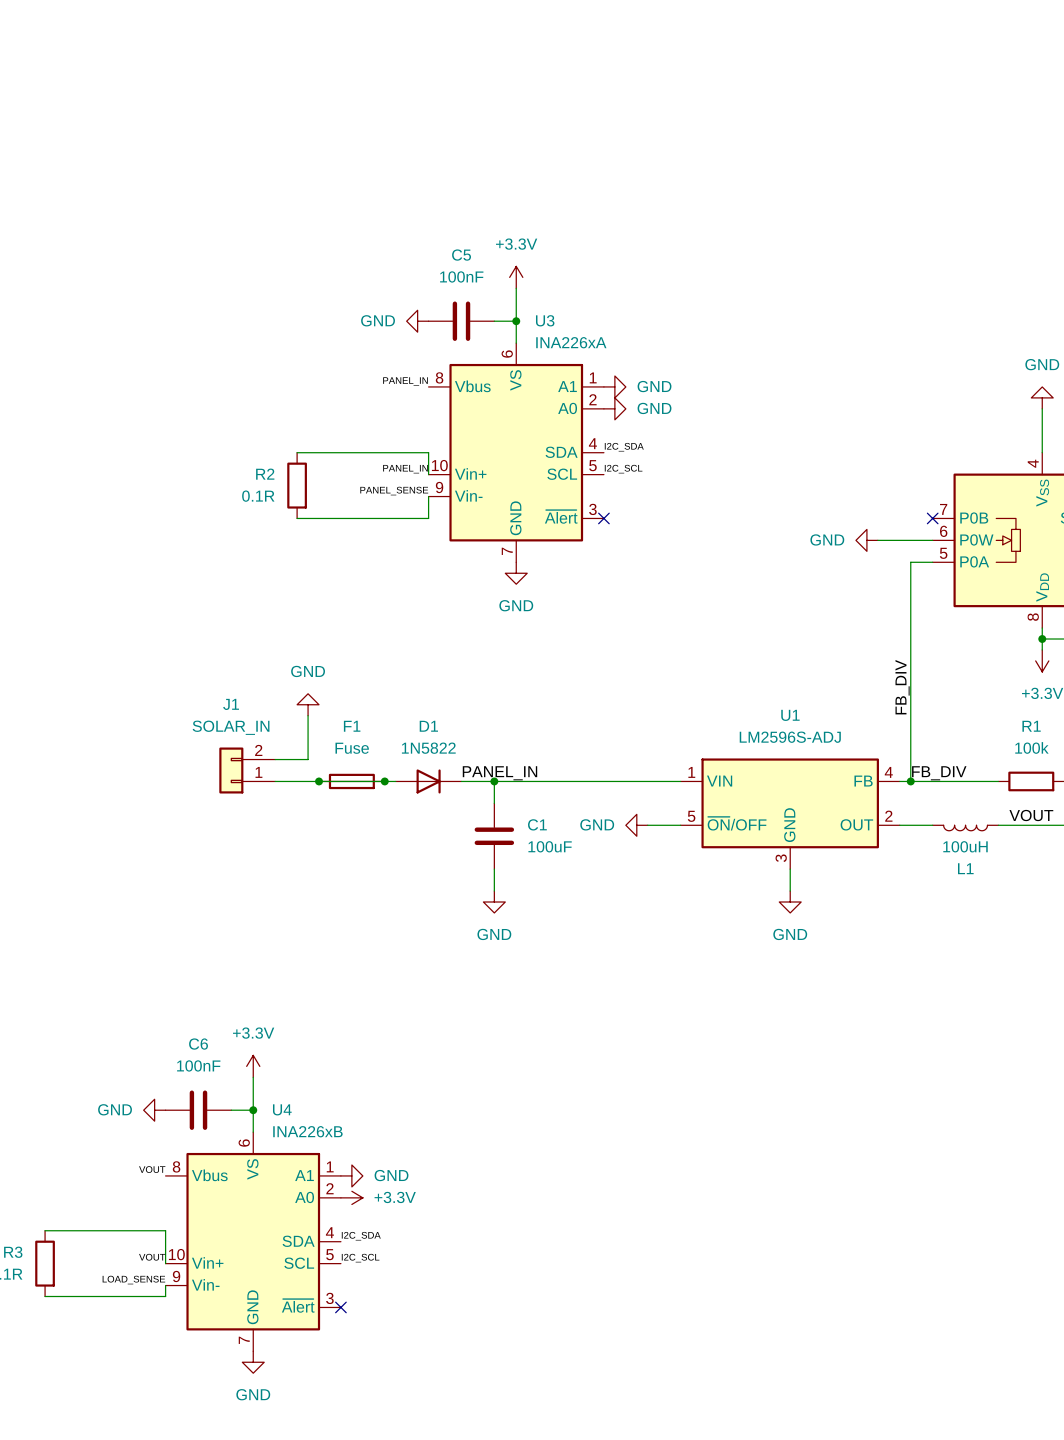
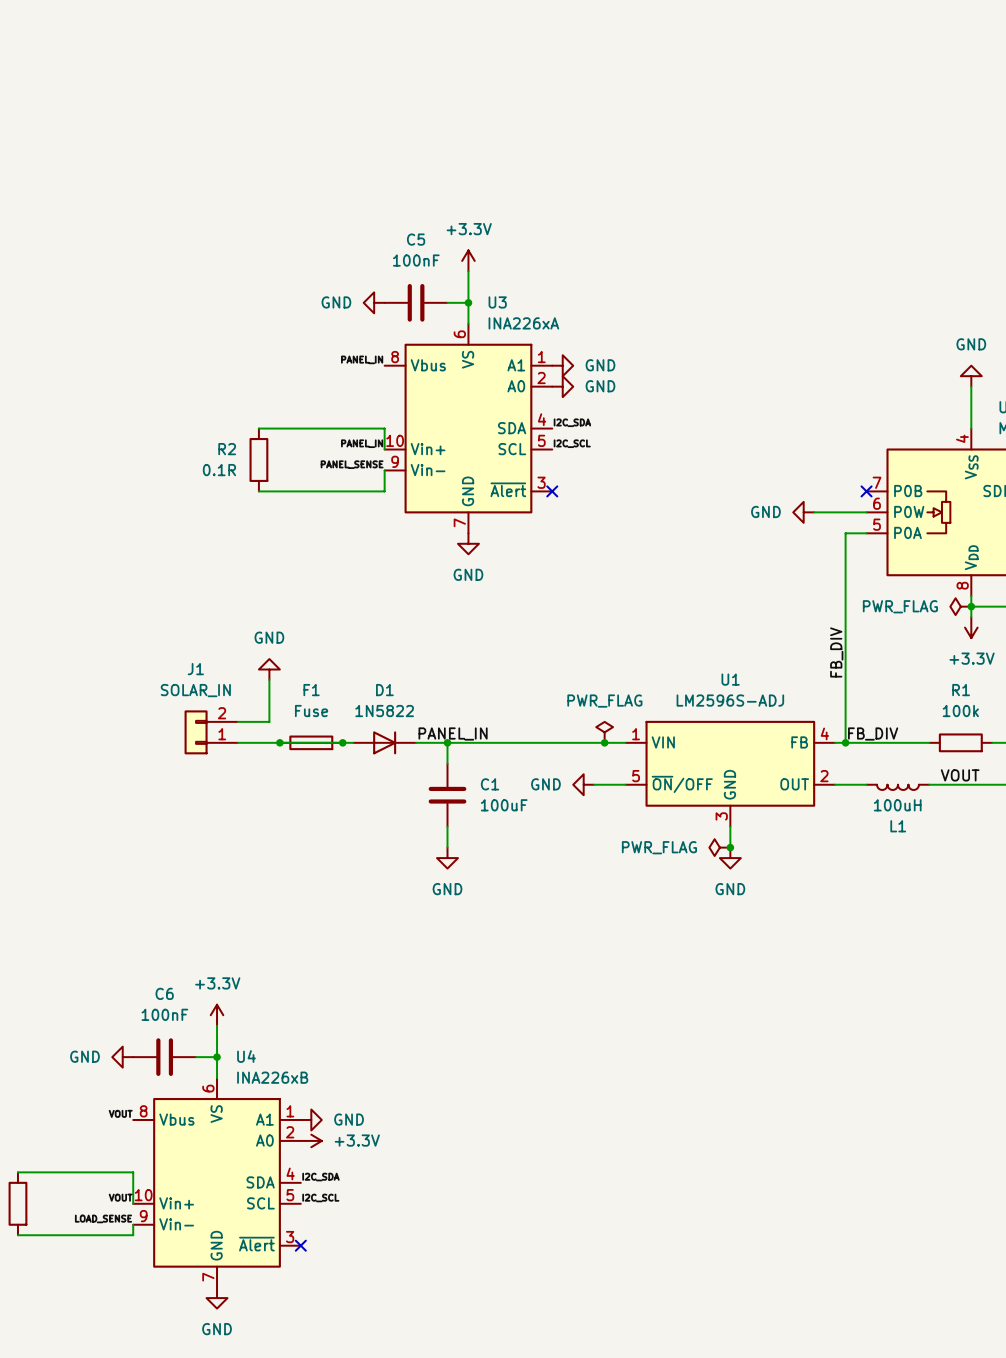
power symbol: none -> PWR_FLAG (960, 606)
power symbol: none -> PWR_FLAG (604, 732)
junction: none -> (604, 742)
power symbol: none -> PWR_FLAG (719, 847)
junction: none -> (730, 847)

